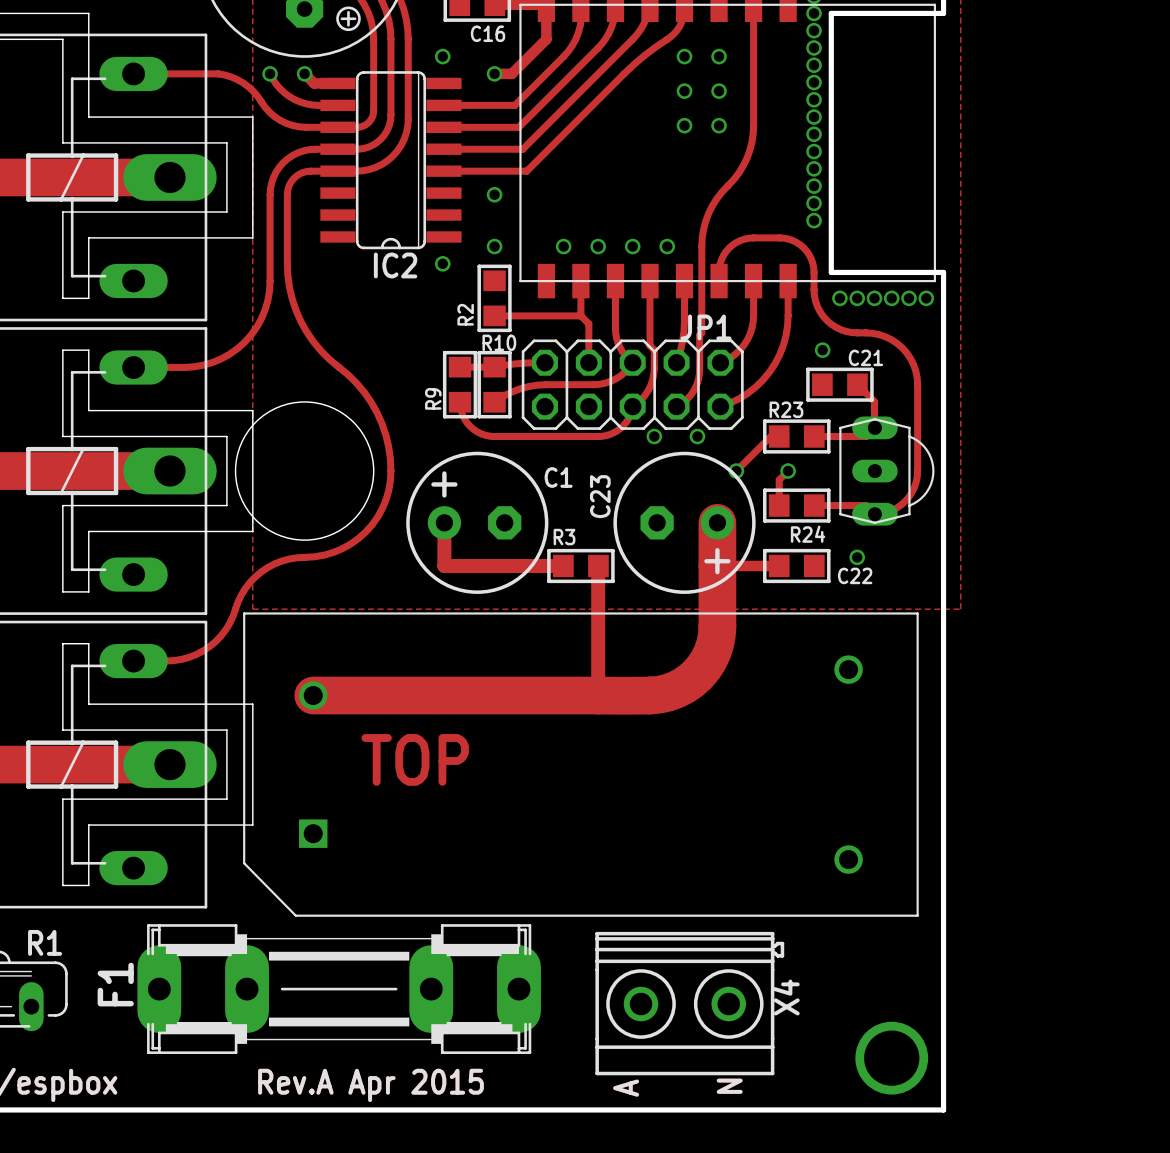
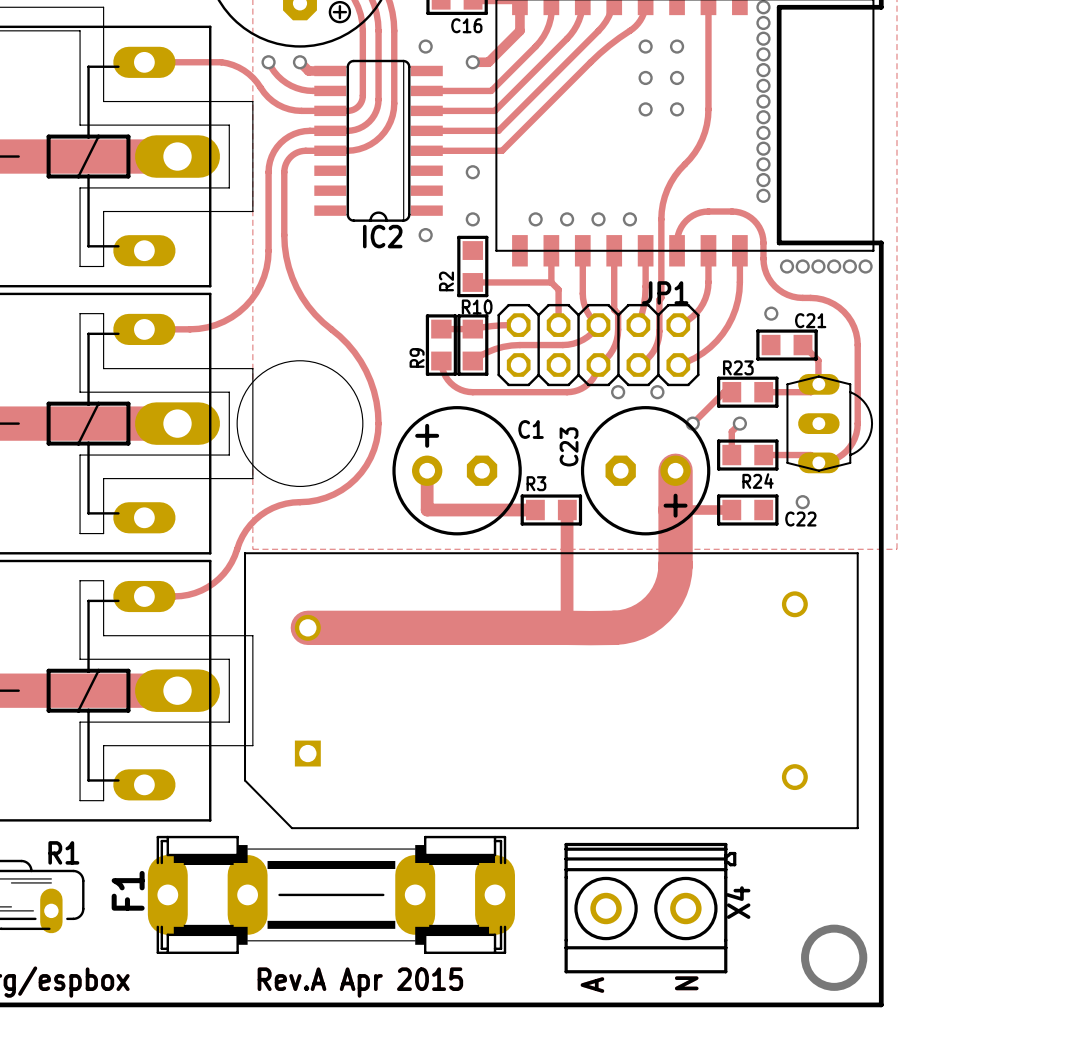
text: TOP (415, 759) -> none

